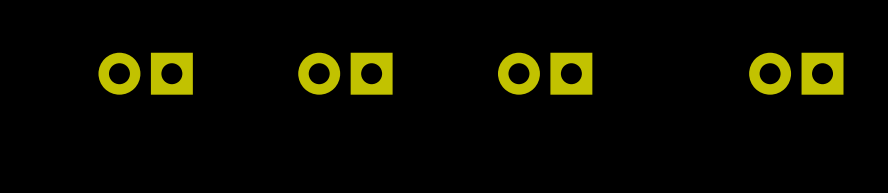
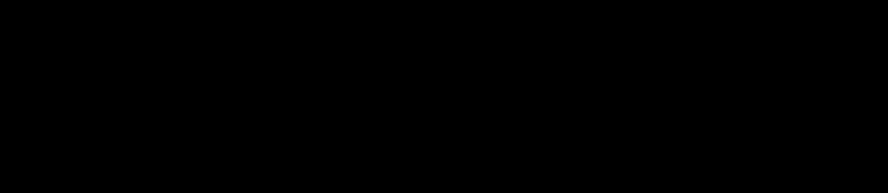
part: (145, 73) -> none
part: (345, 73) -> none
part: (545, 73) -> none
part: (796, 73) -> none

